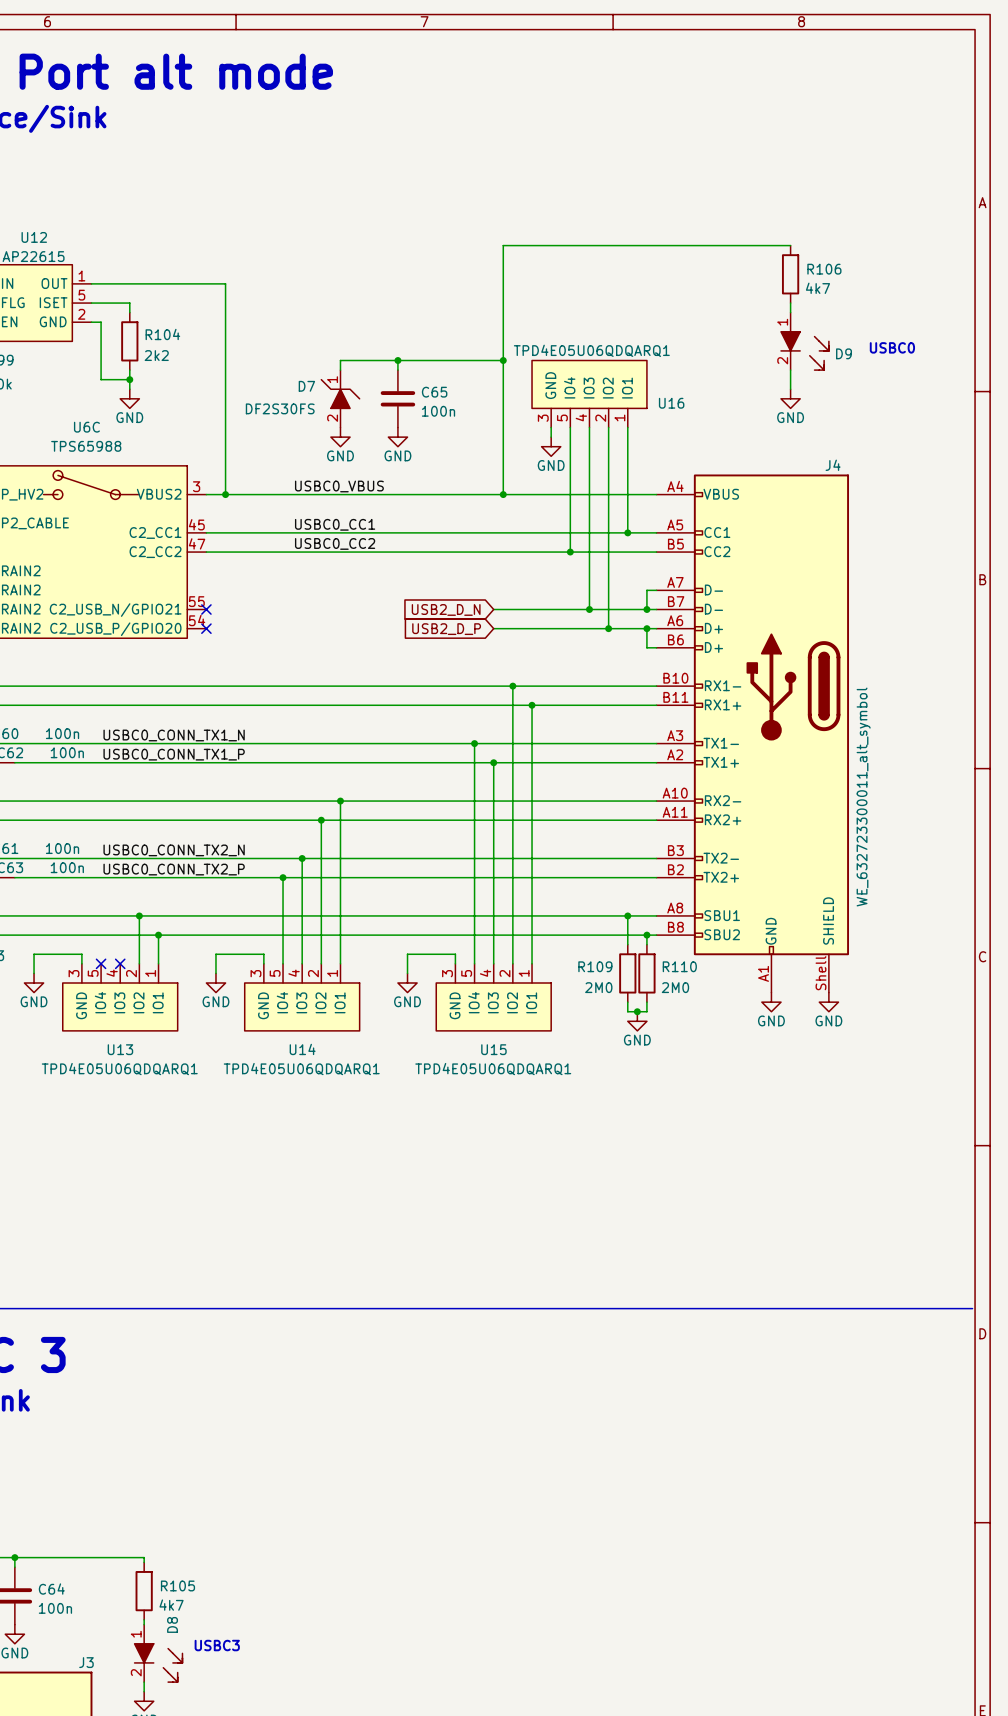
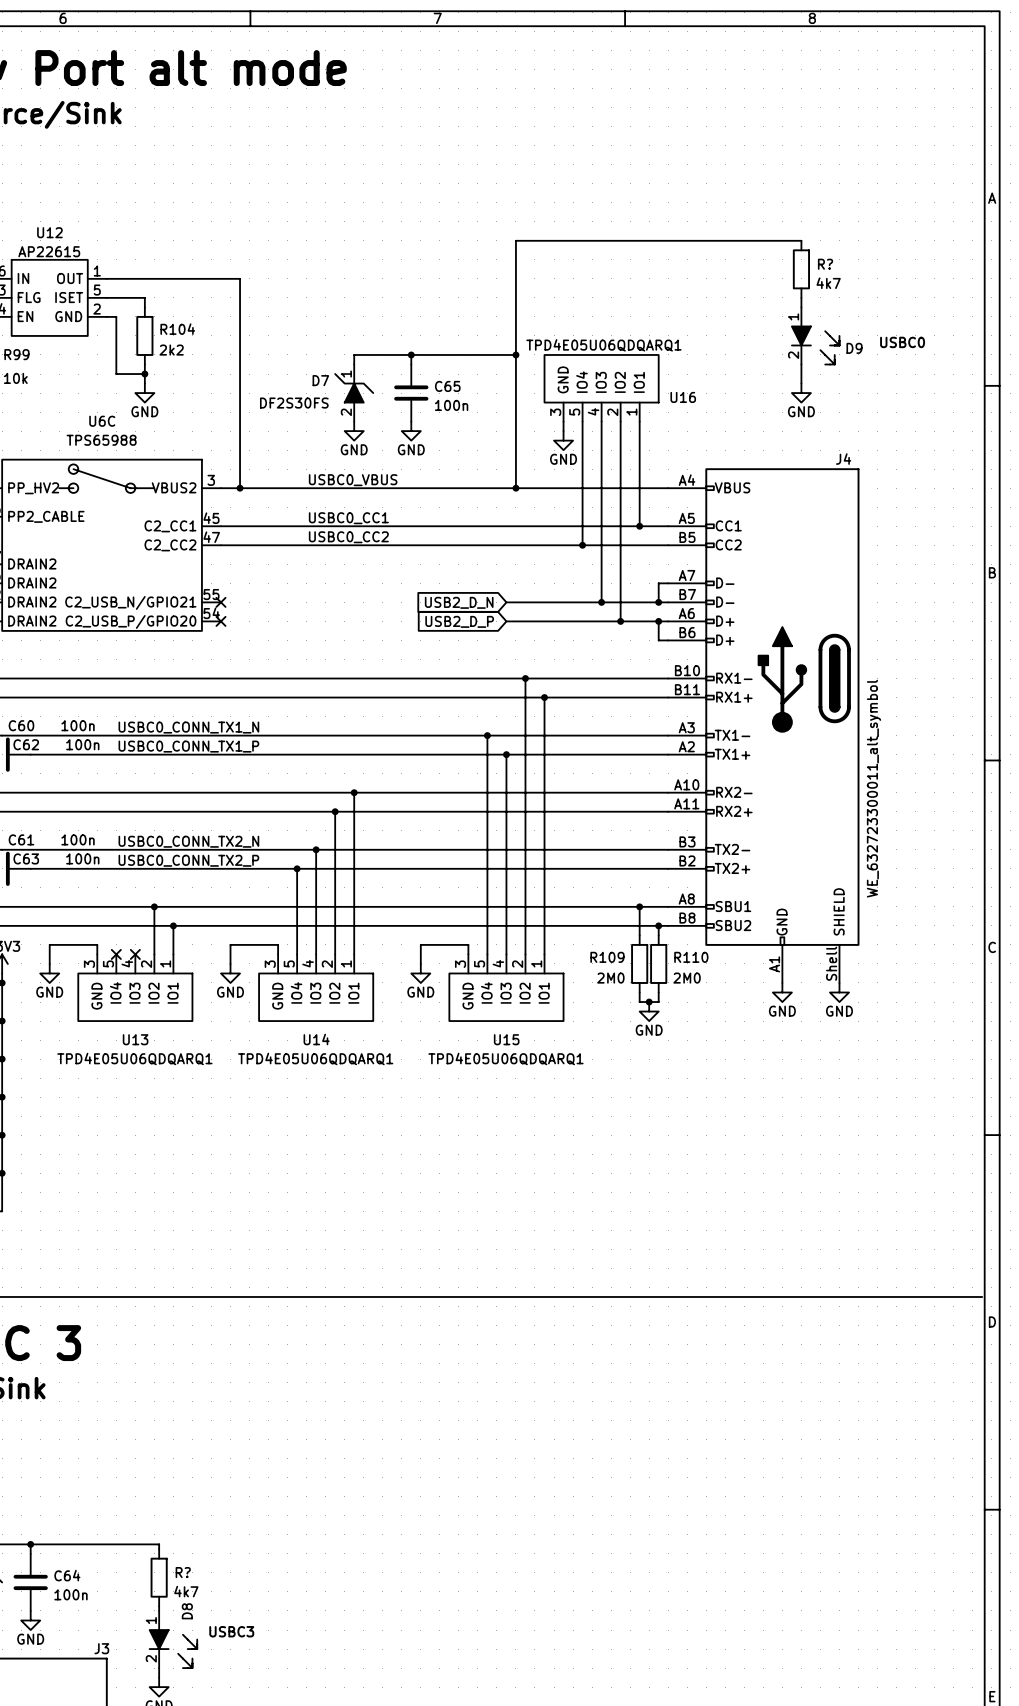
R106 name: R106 (824, 269) -> R? (825, 264)
R105 name: R105 (177, 1585) -> R? (183, 1572)

